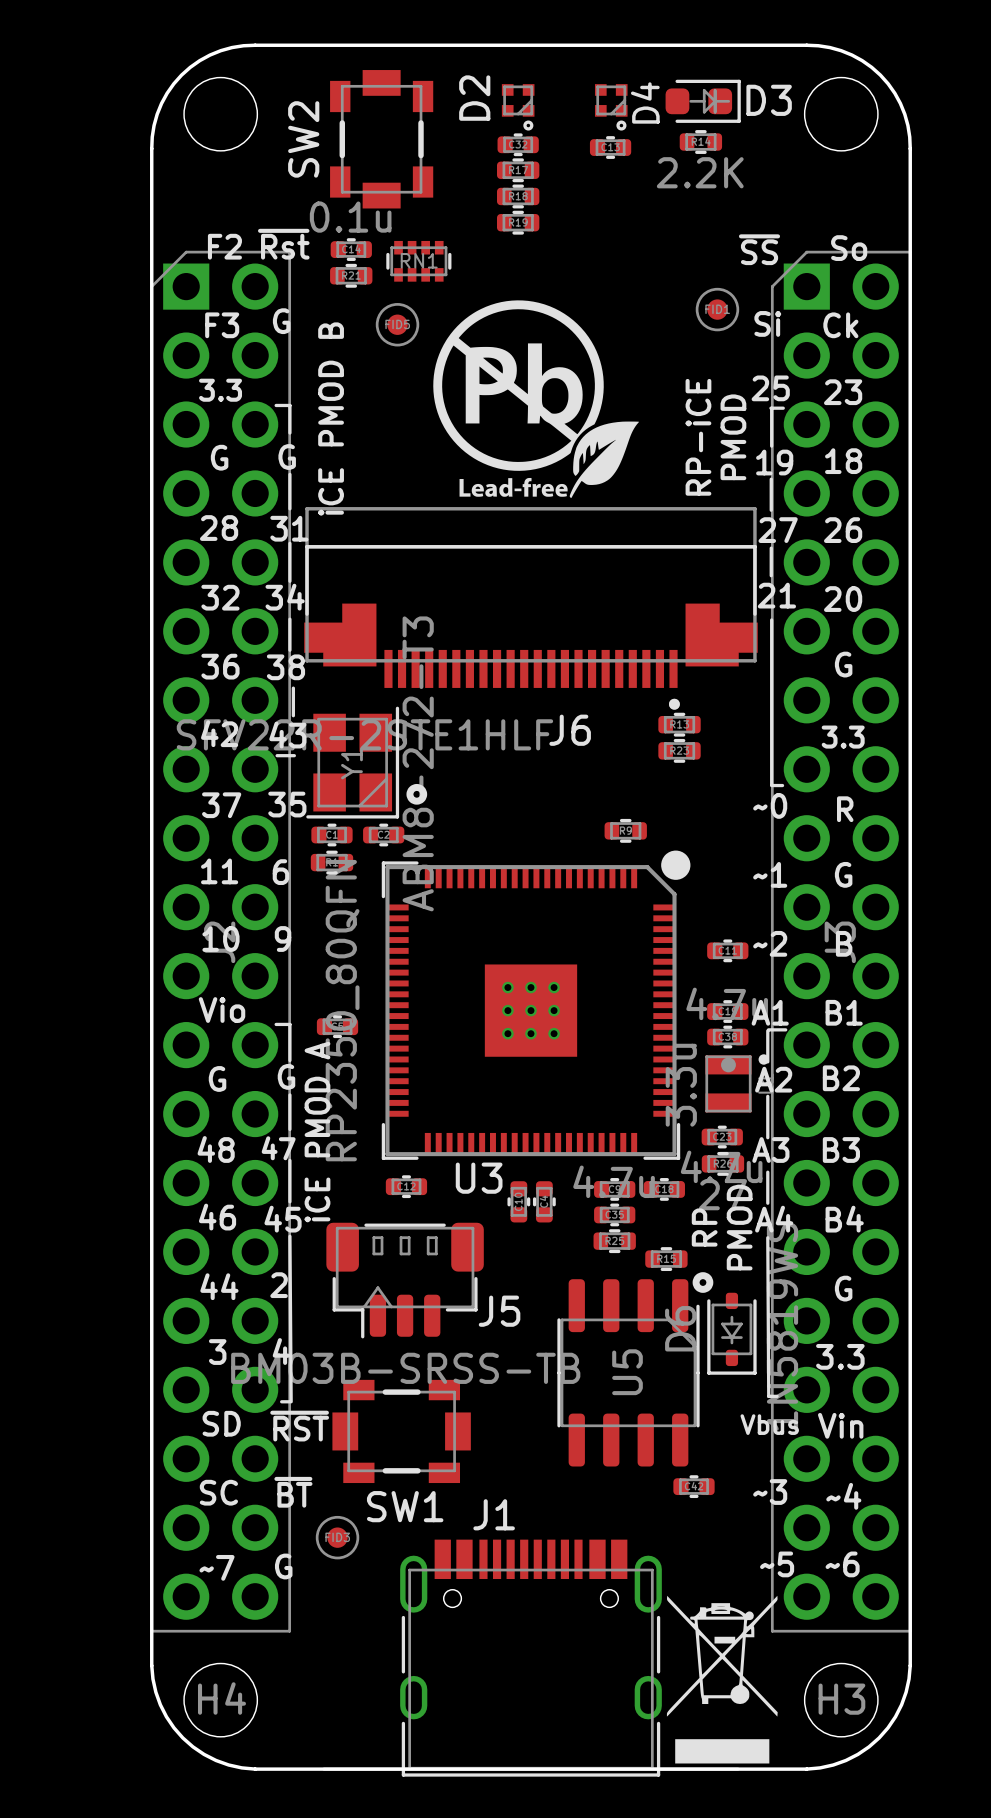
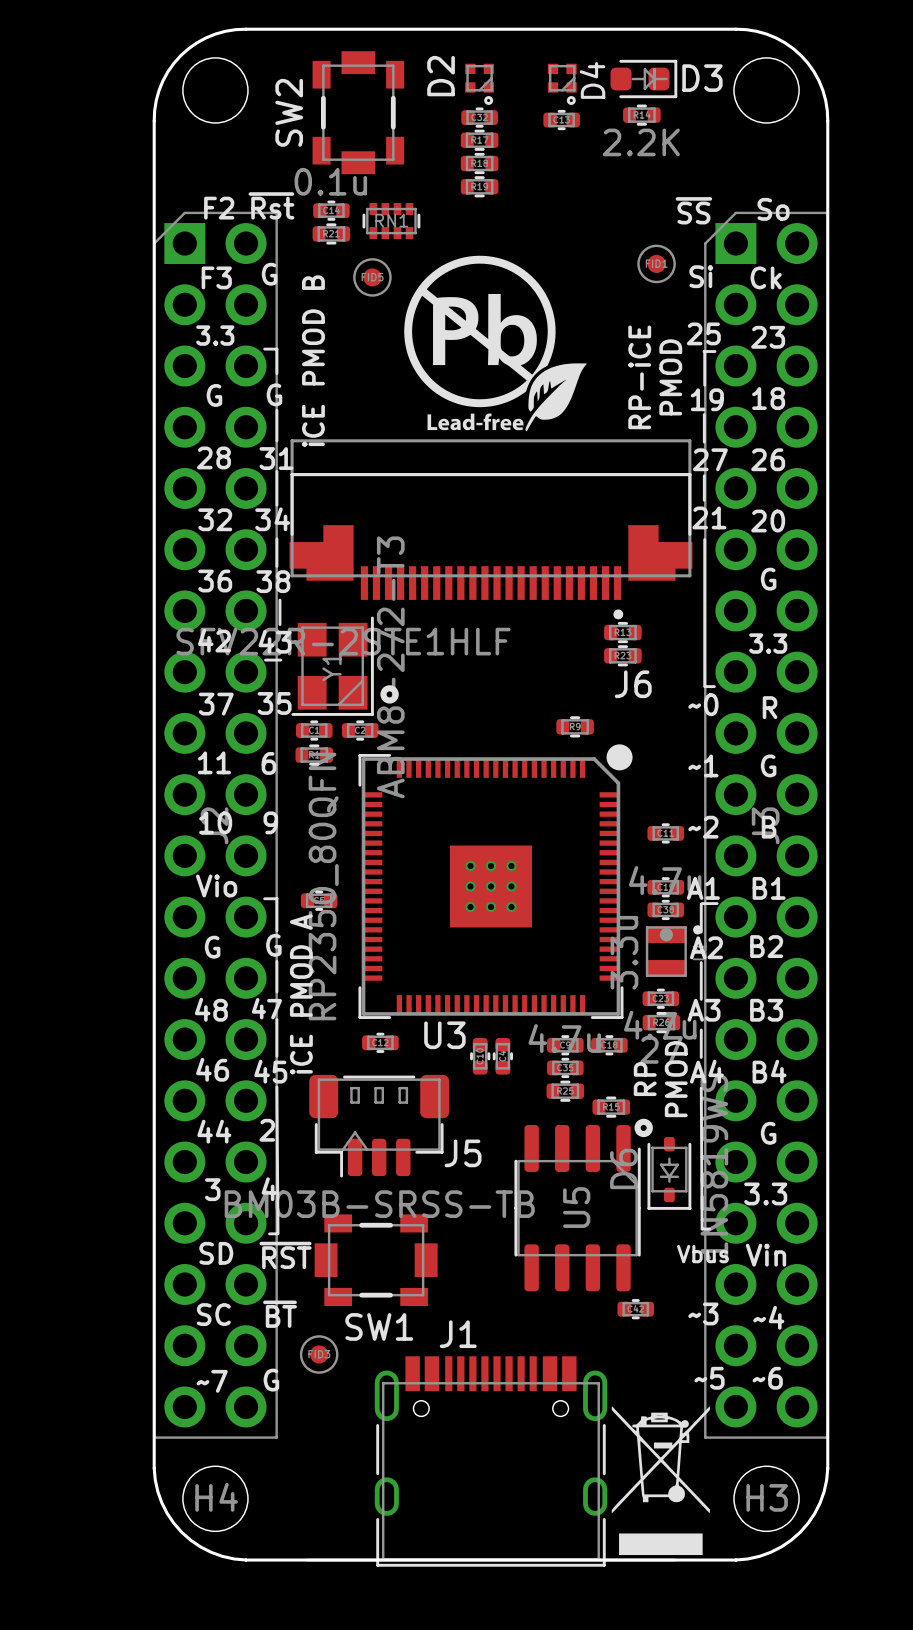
J6 name position: J6 (570, 730) -> J6 (633, 684)

